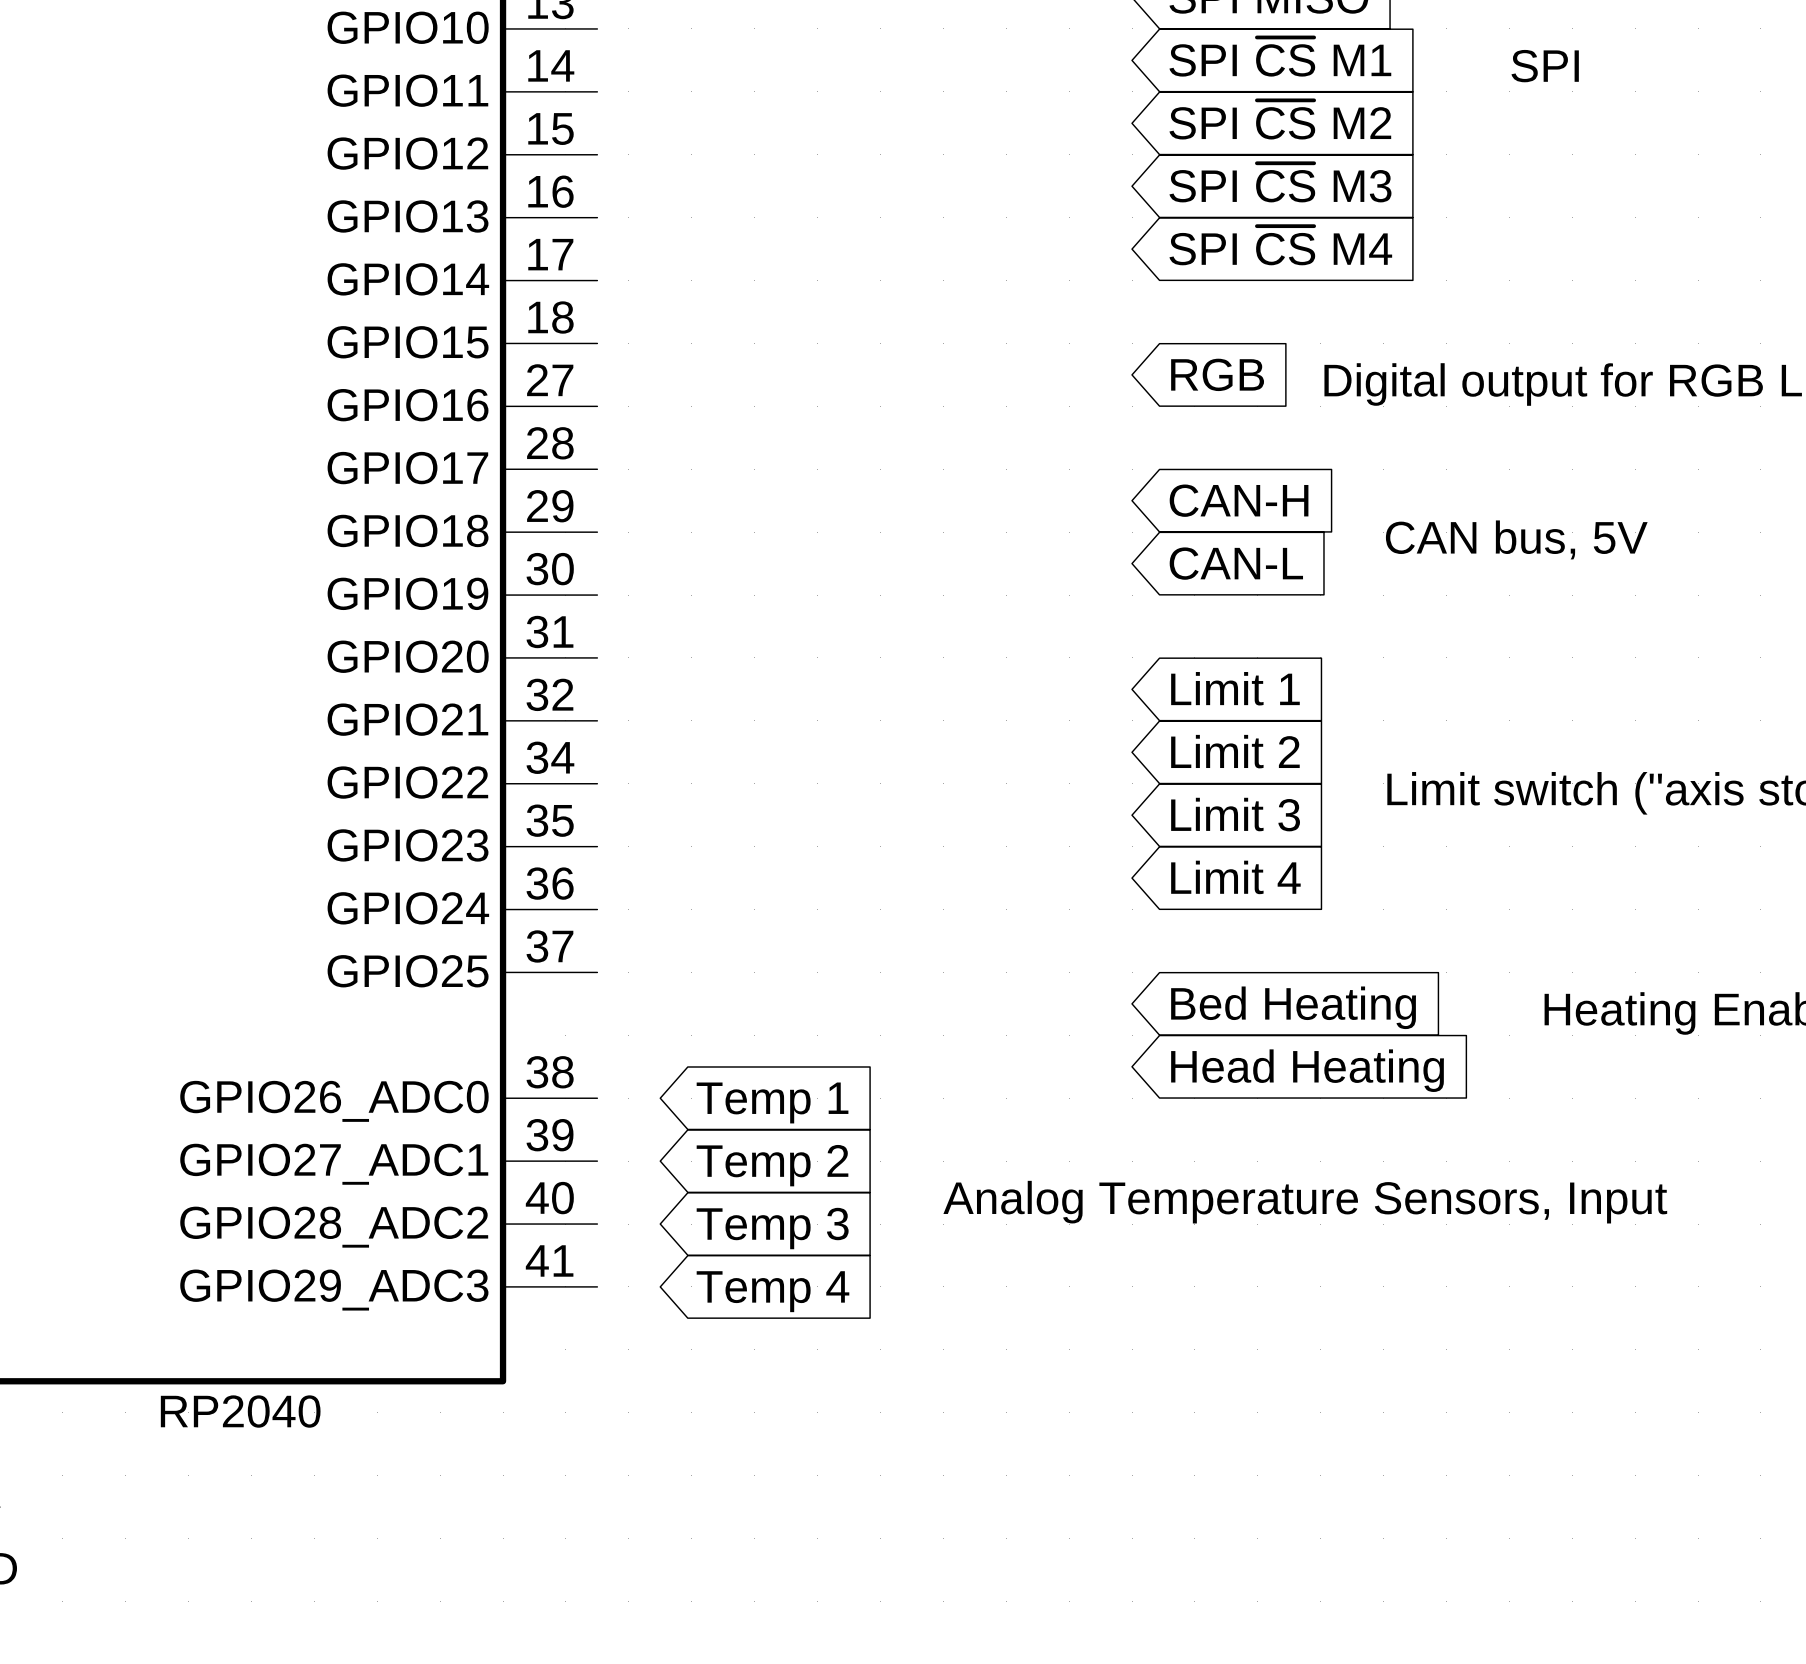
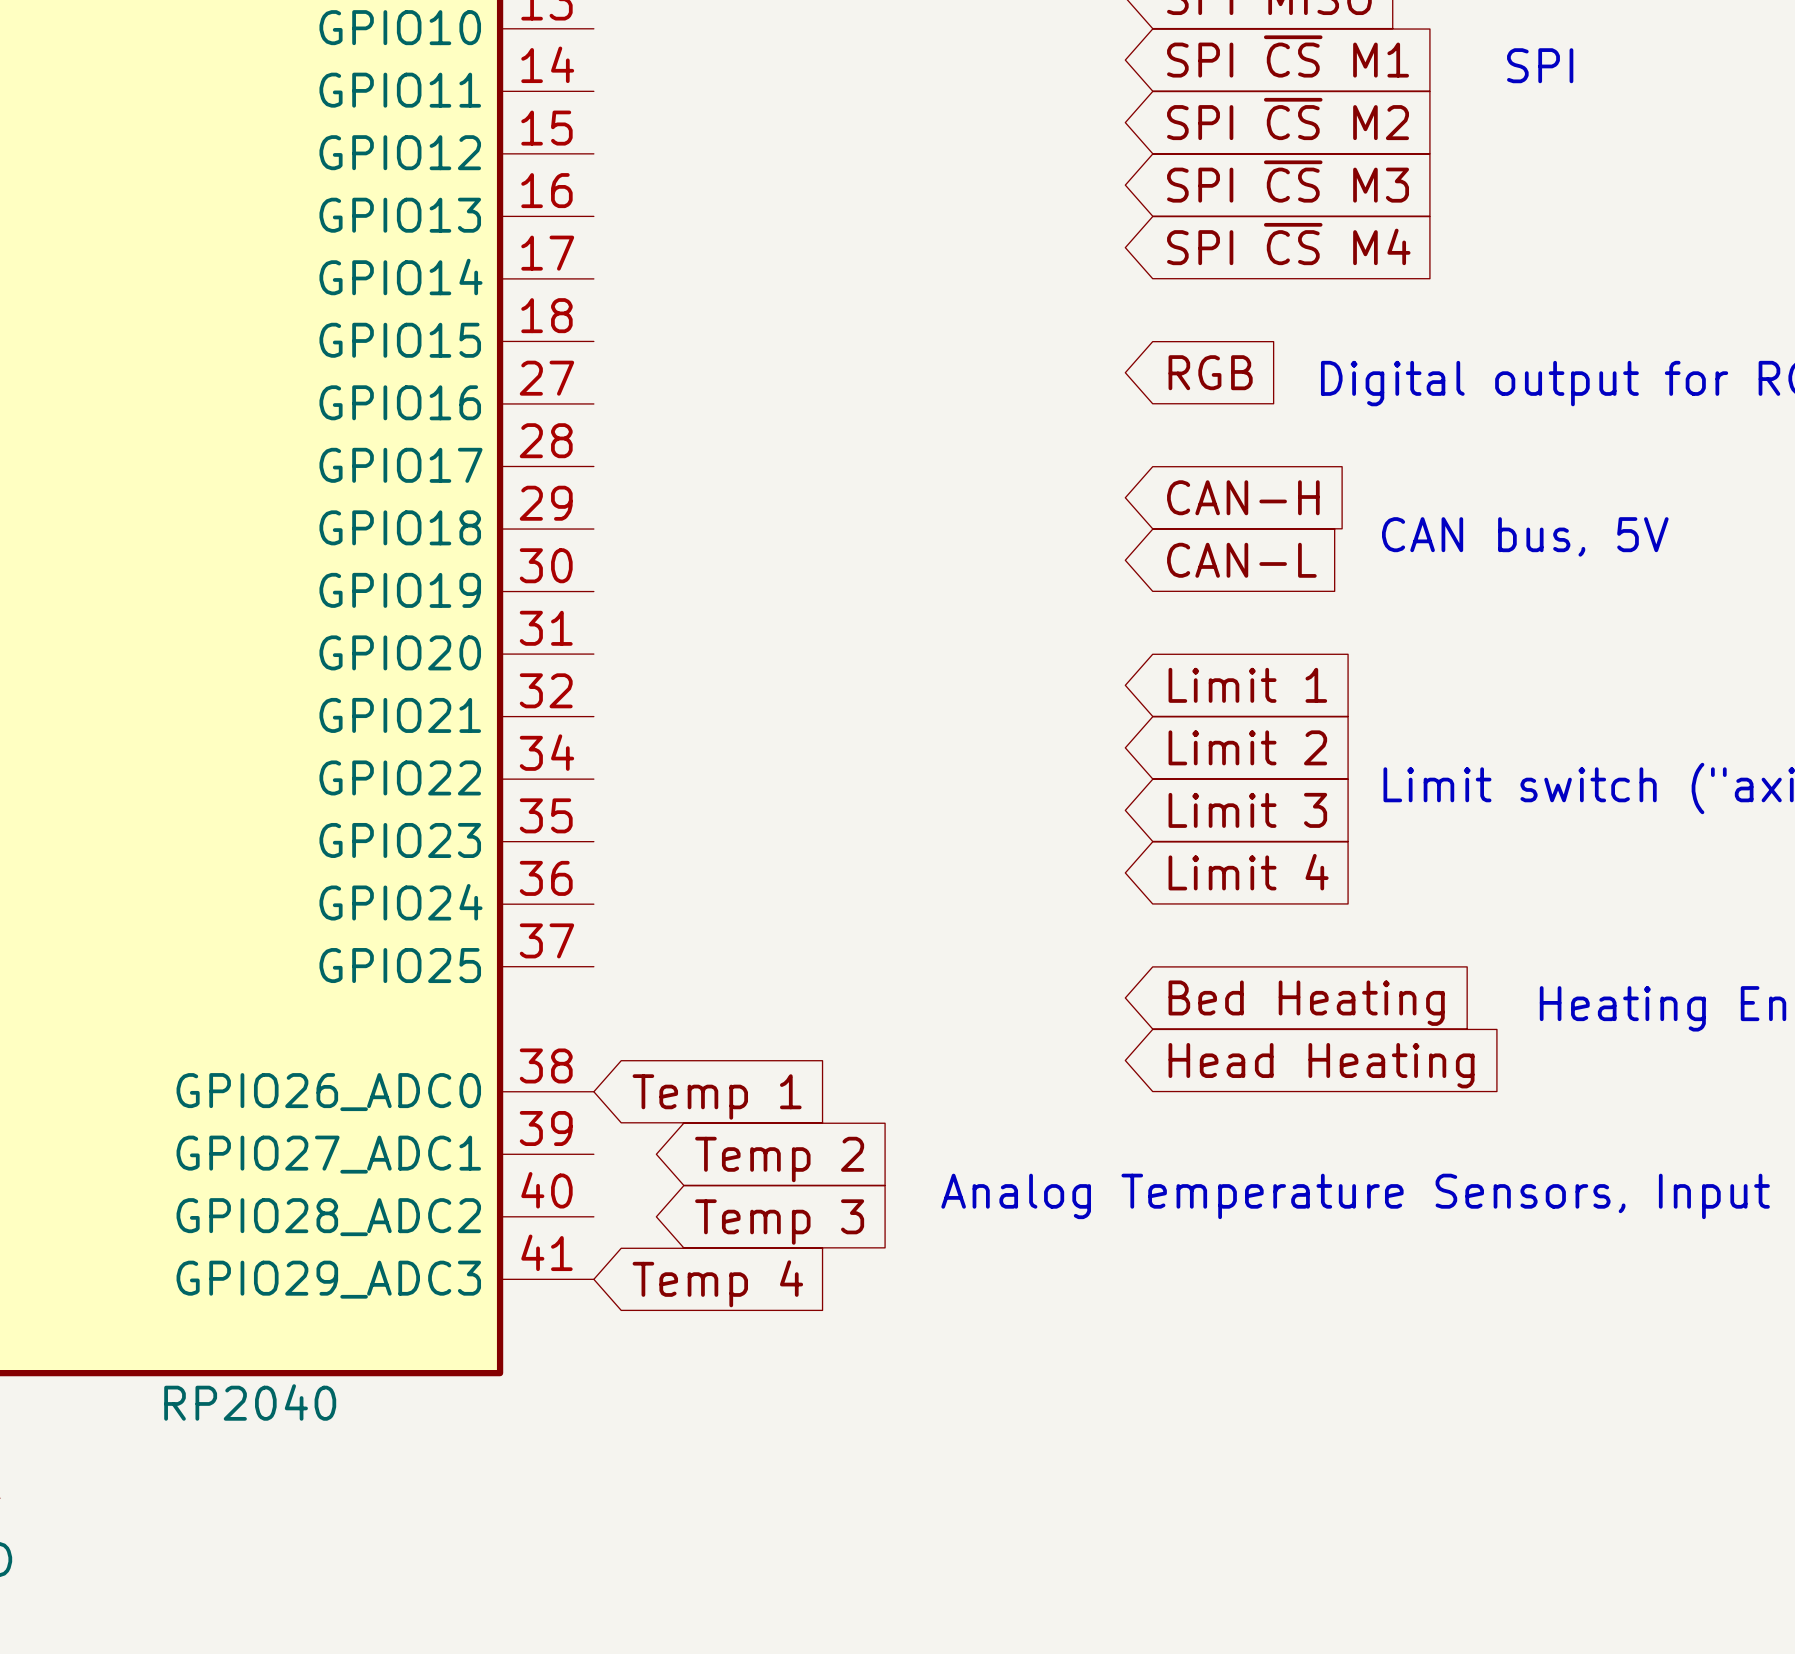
global label position: Temp 1 (772, 1102) -> Temp 1 (717, 1096)
global label position: Temp 4 (772, 1291) -> Temp 4 (717, 1283)

